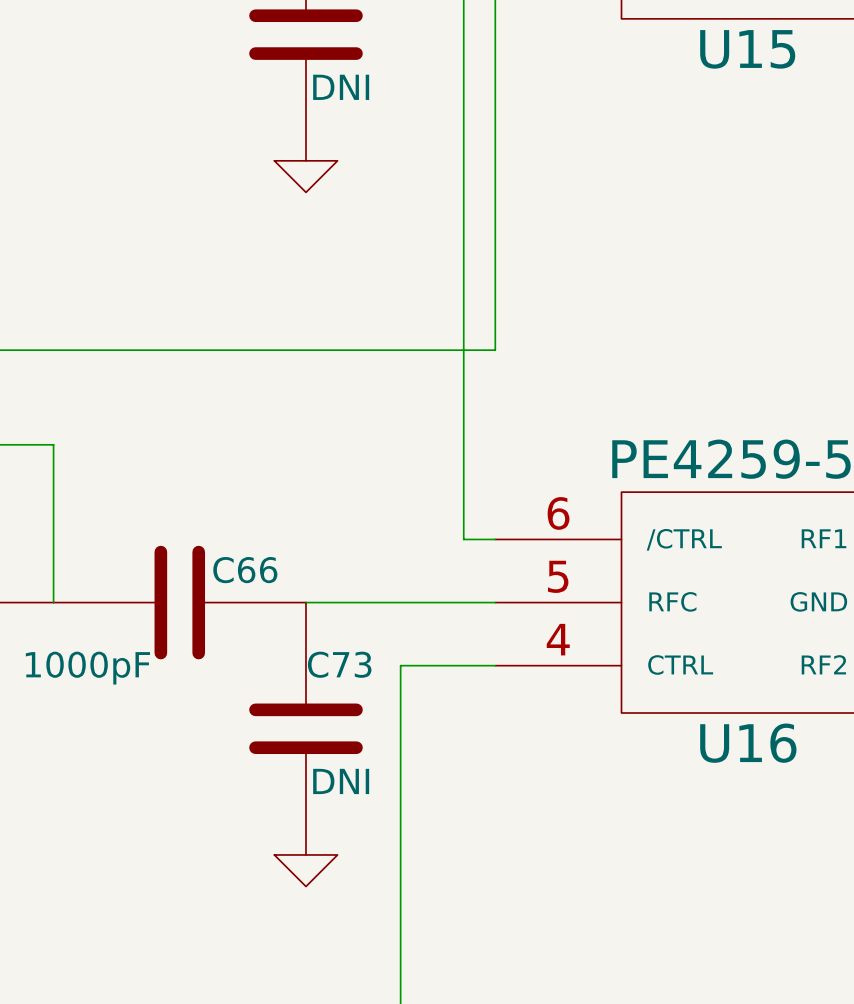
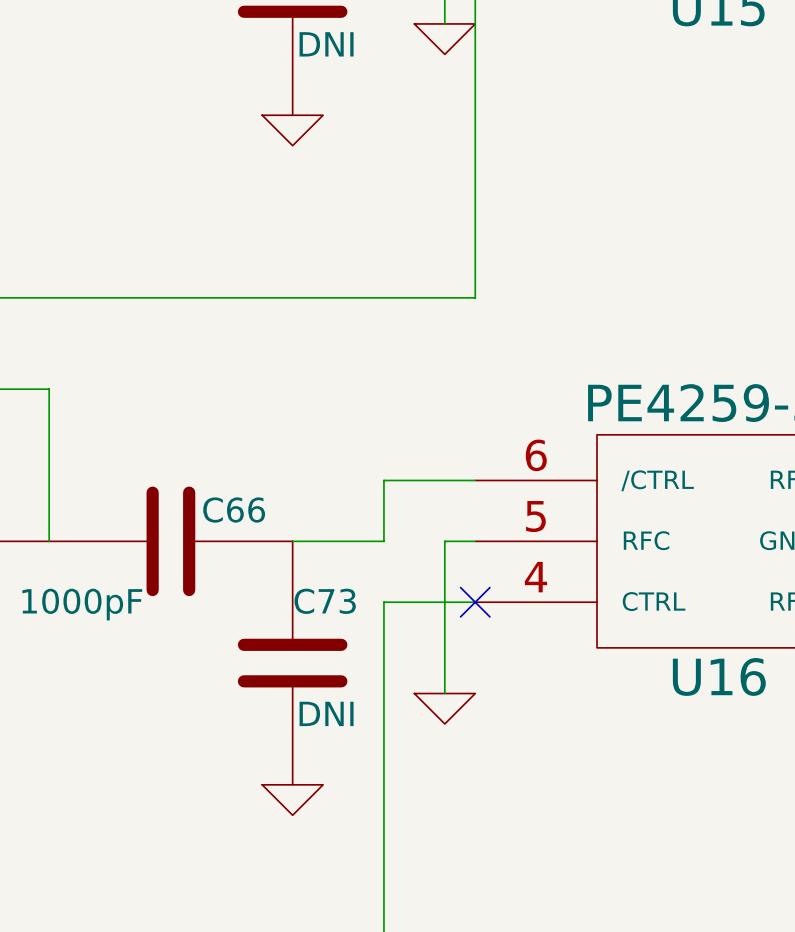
wire: (463, 66) (463, 539) -> none
power symbol: none -> (444, 39)
wire: (400, 602) (463, 602) -> (383, 541) (383, 480) (444, 480)
wire: none -> (444, 541) (444, 693)
no-connect mark: none -> (475, 602)
power symbol: none -> (444, 708)

